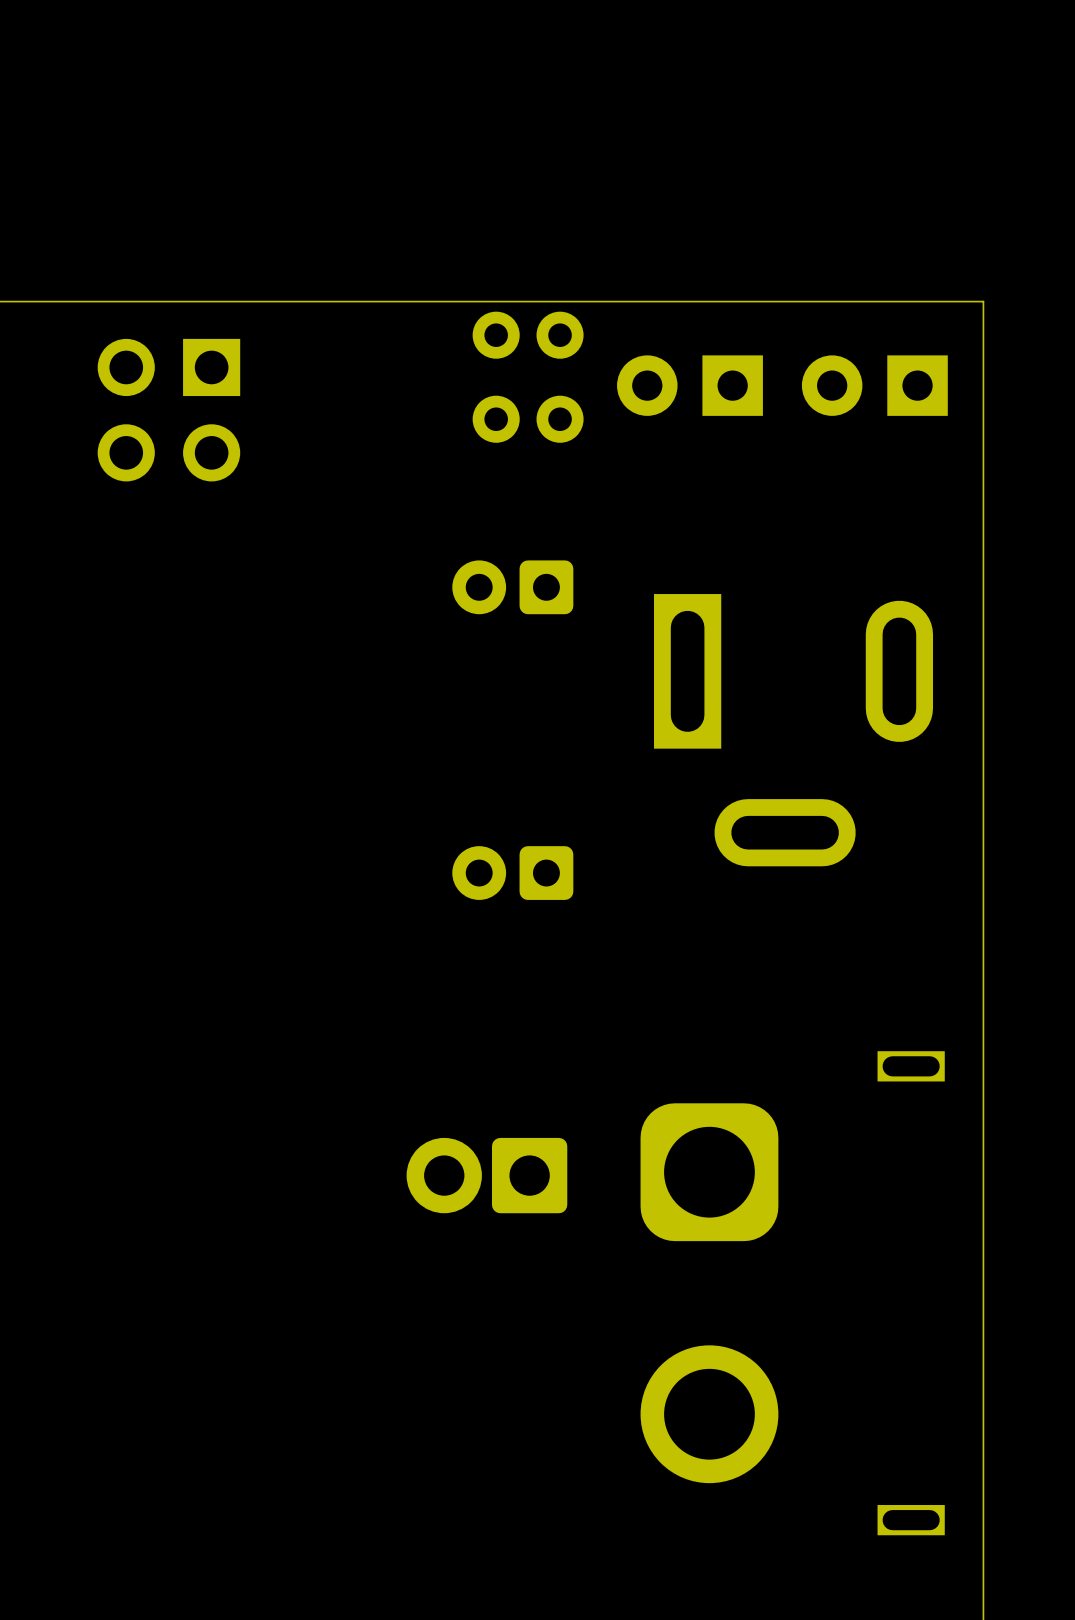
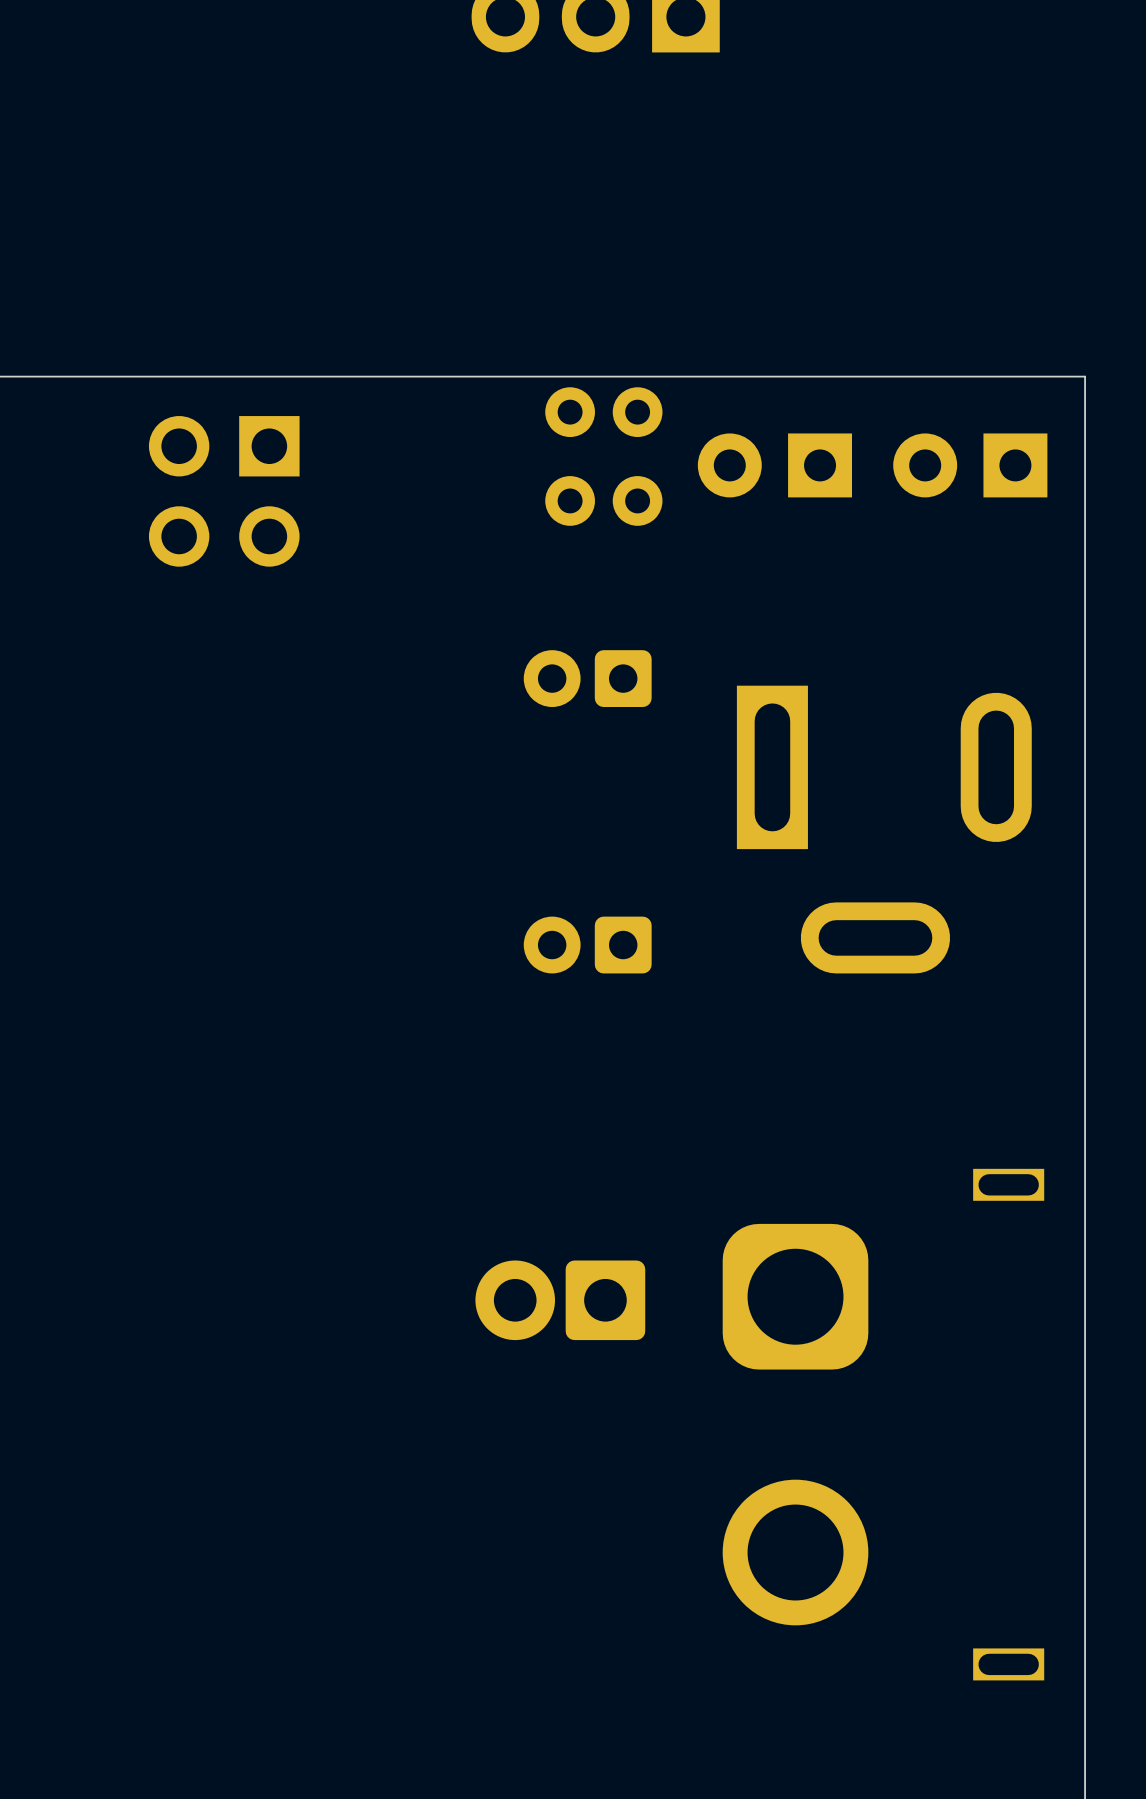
part position: (512, 873) -> (587, 945)

